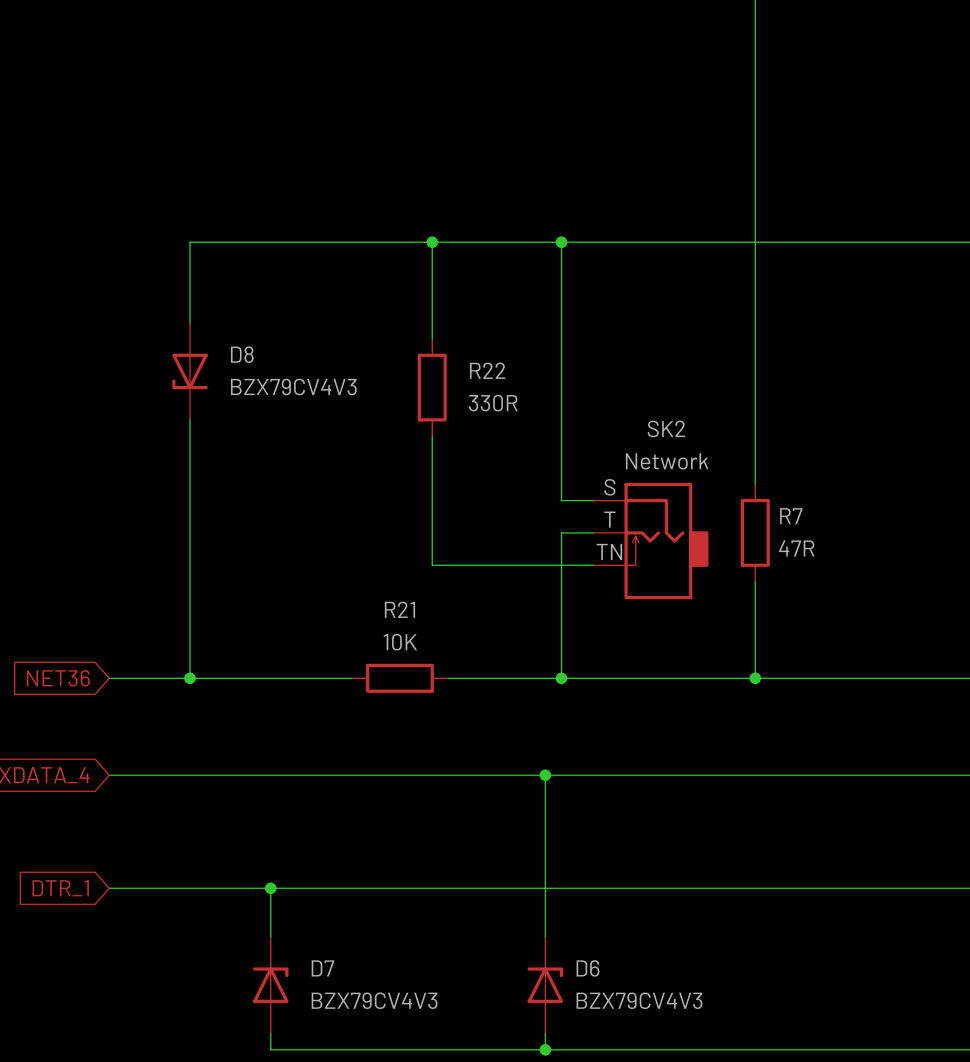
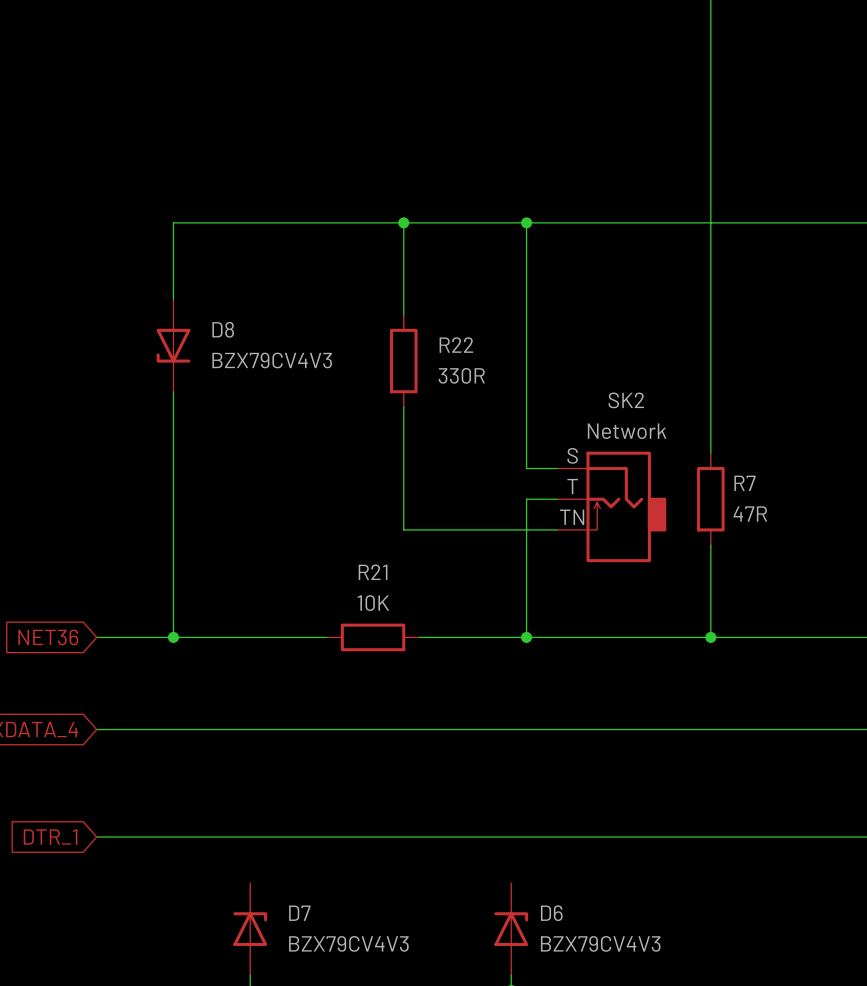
wire: (545, 775) (545, 936) -> none
junction: (545, 775) -> none
wire: (270, 888) (270, 936) -> none
junction: (270, 888) -> none

